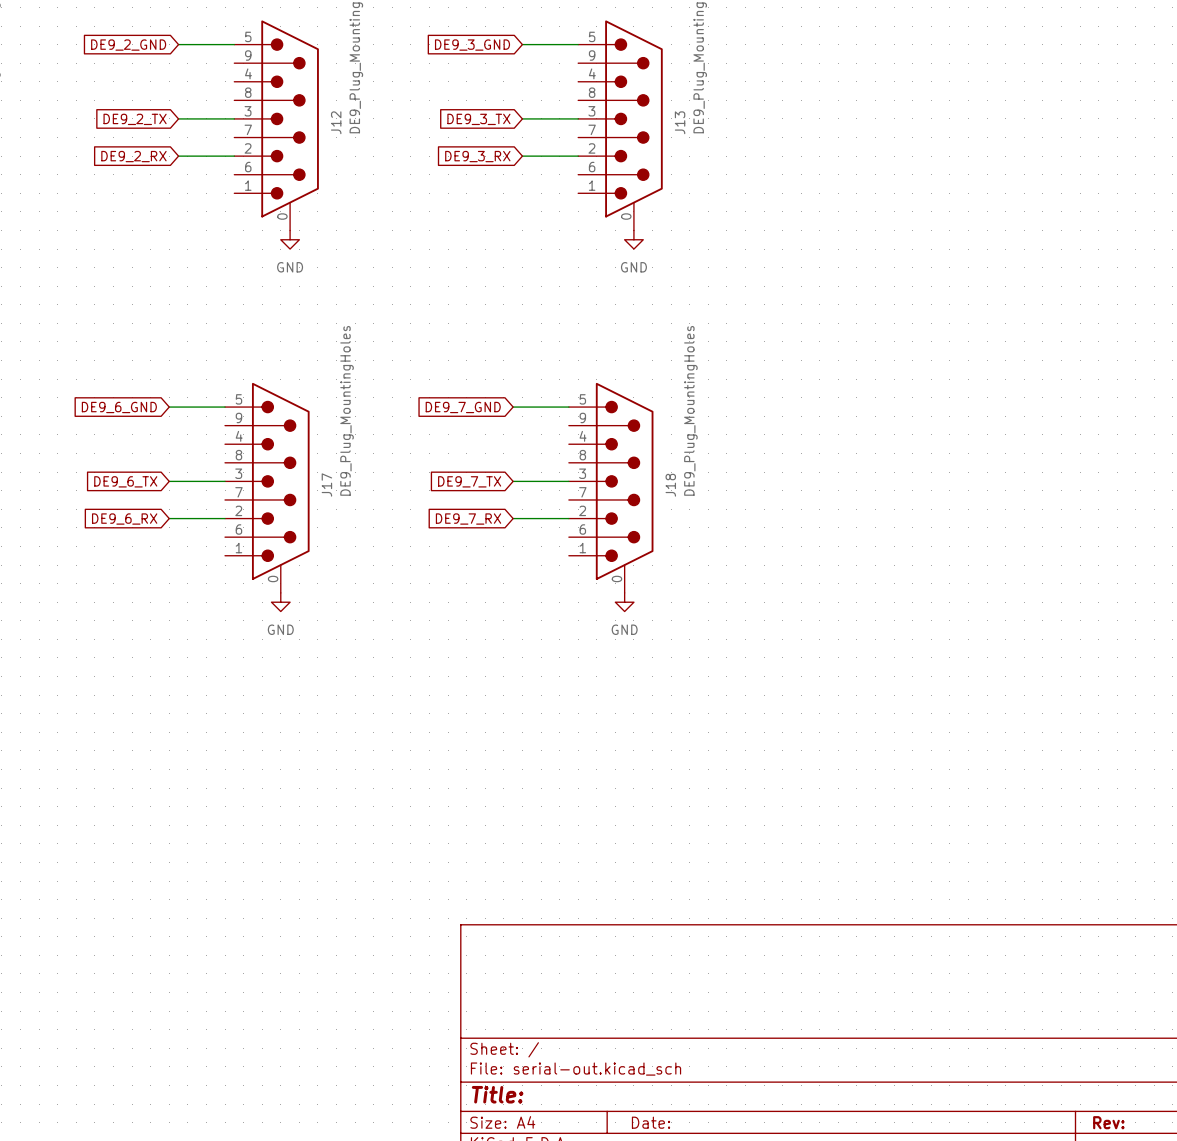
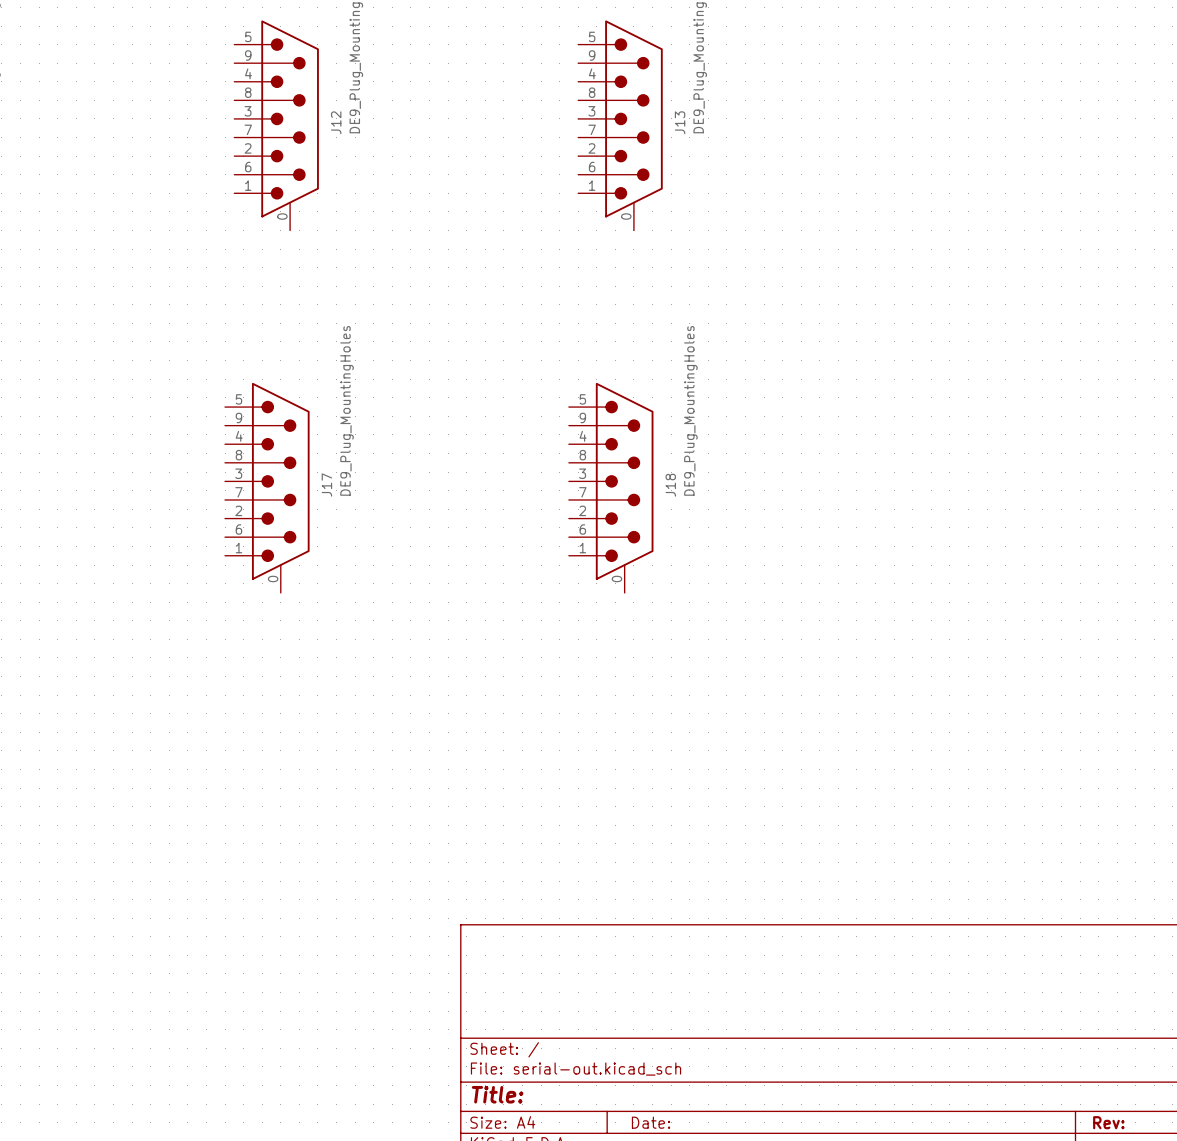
wire: (178, 44) (234, 44) -> none
wire: (522, 44) (578, 44) -> none
global label: DE9_2_GND (128, 45) -> none
global label: DE9_3_GND (472, 45) -> none
wire: (178, 118) (234, 118) -> none
wire: (522, 118) (578, 118) -> none
global label: DE9_2_TX (135, 119) -> none
global label: DE9_3_TX (478, 119) -> none
global label: DE9_2_RX (133, 156) -> none
wire: (178, 156) (234, 156) -> none
global label: DE9_3_RX (477, 156) -> none
wire: (522, 156) (578, 156) -> none
power symbol: GND (290, 239) -> none
power symbol: GND (633, 239) -> none
global label: DE9_6_GND (119, 407) -> none
wire: (169, 407) (225, 407) -> none
global label: DE9_7_GND (463, 407) -> none
wire: (513, 407) (568, 407) -> none
global label: DE9_6_TX (125, 481) -> none
wire: (169, 481) (225, 481) -> none
global label: DE9_7_TX (469, 481) -> none
wire: (513, 481) (568, 481) -> none
wire: (169, 518) (225, 518) -> none
wire: (513, 518) (568, 518) -> none
global label: DE9_6_RX (124, 519) -> none
global label: DE9_7_RX (468, 519) -> none
power symbol: GND (280, 602) -> none
power symbol: GND (624, 602) -> none

